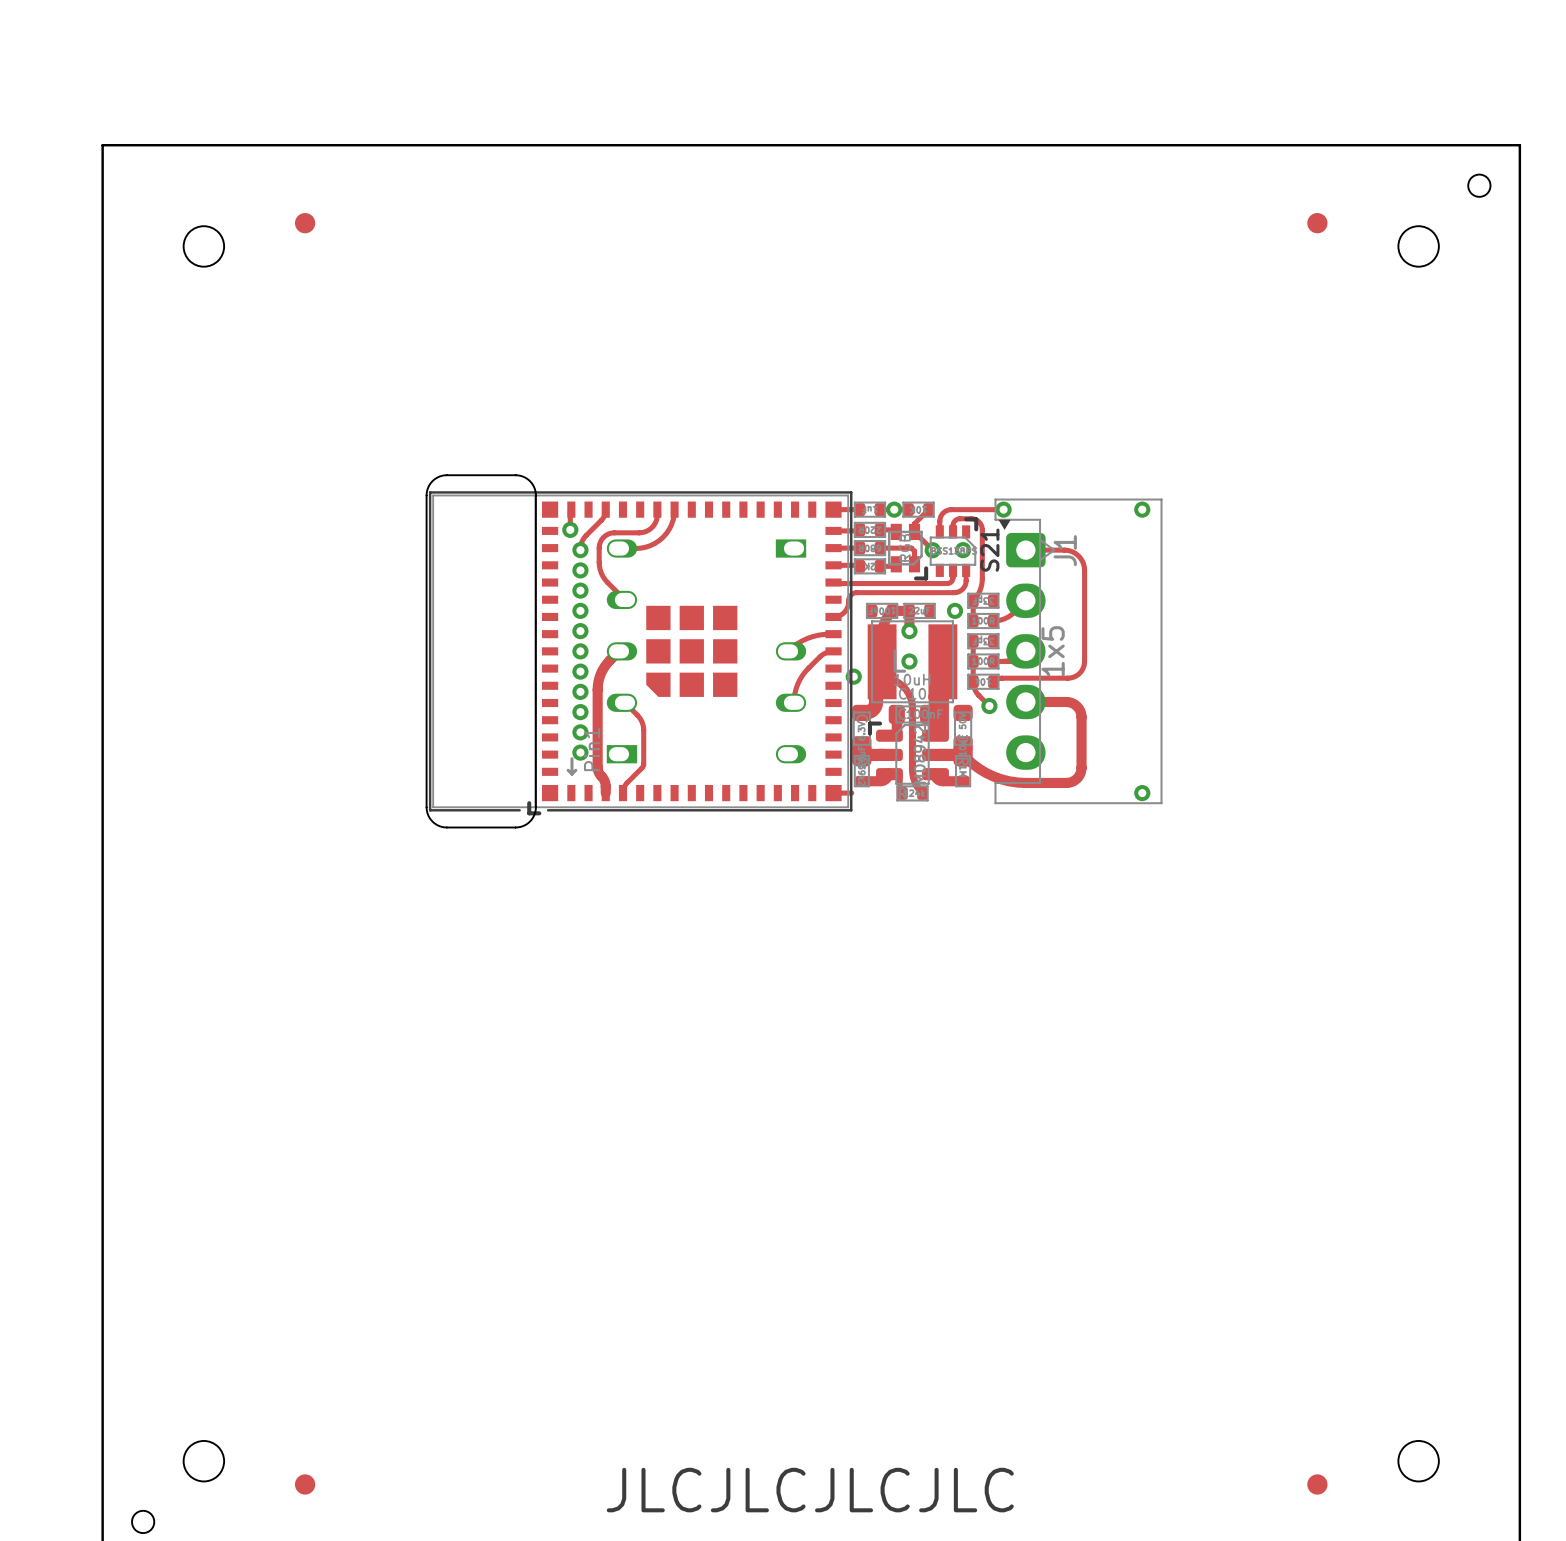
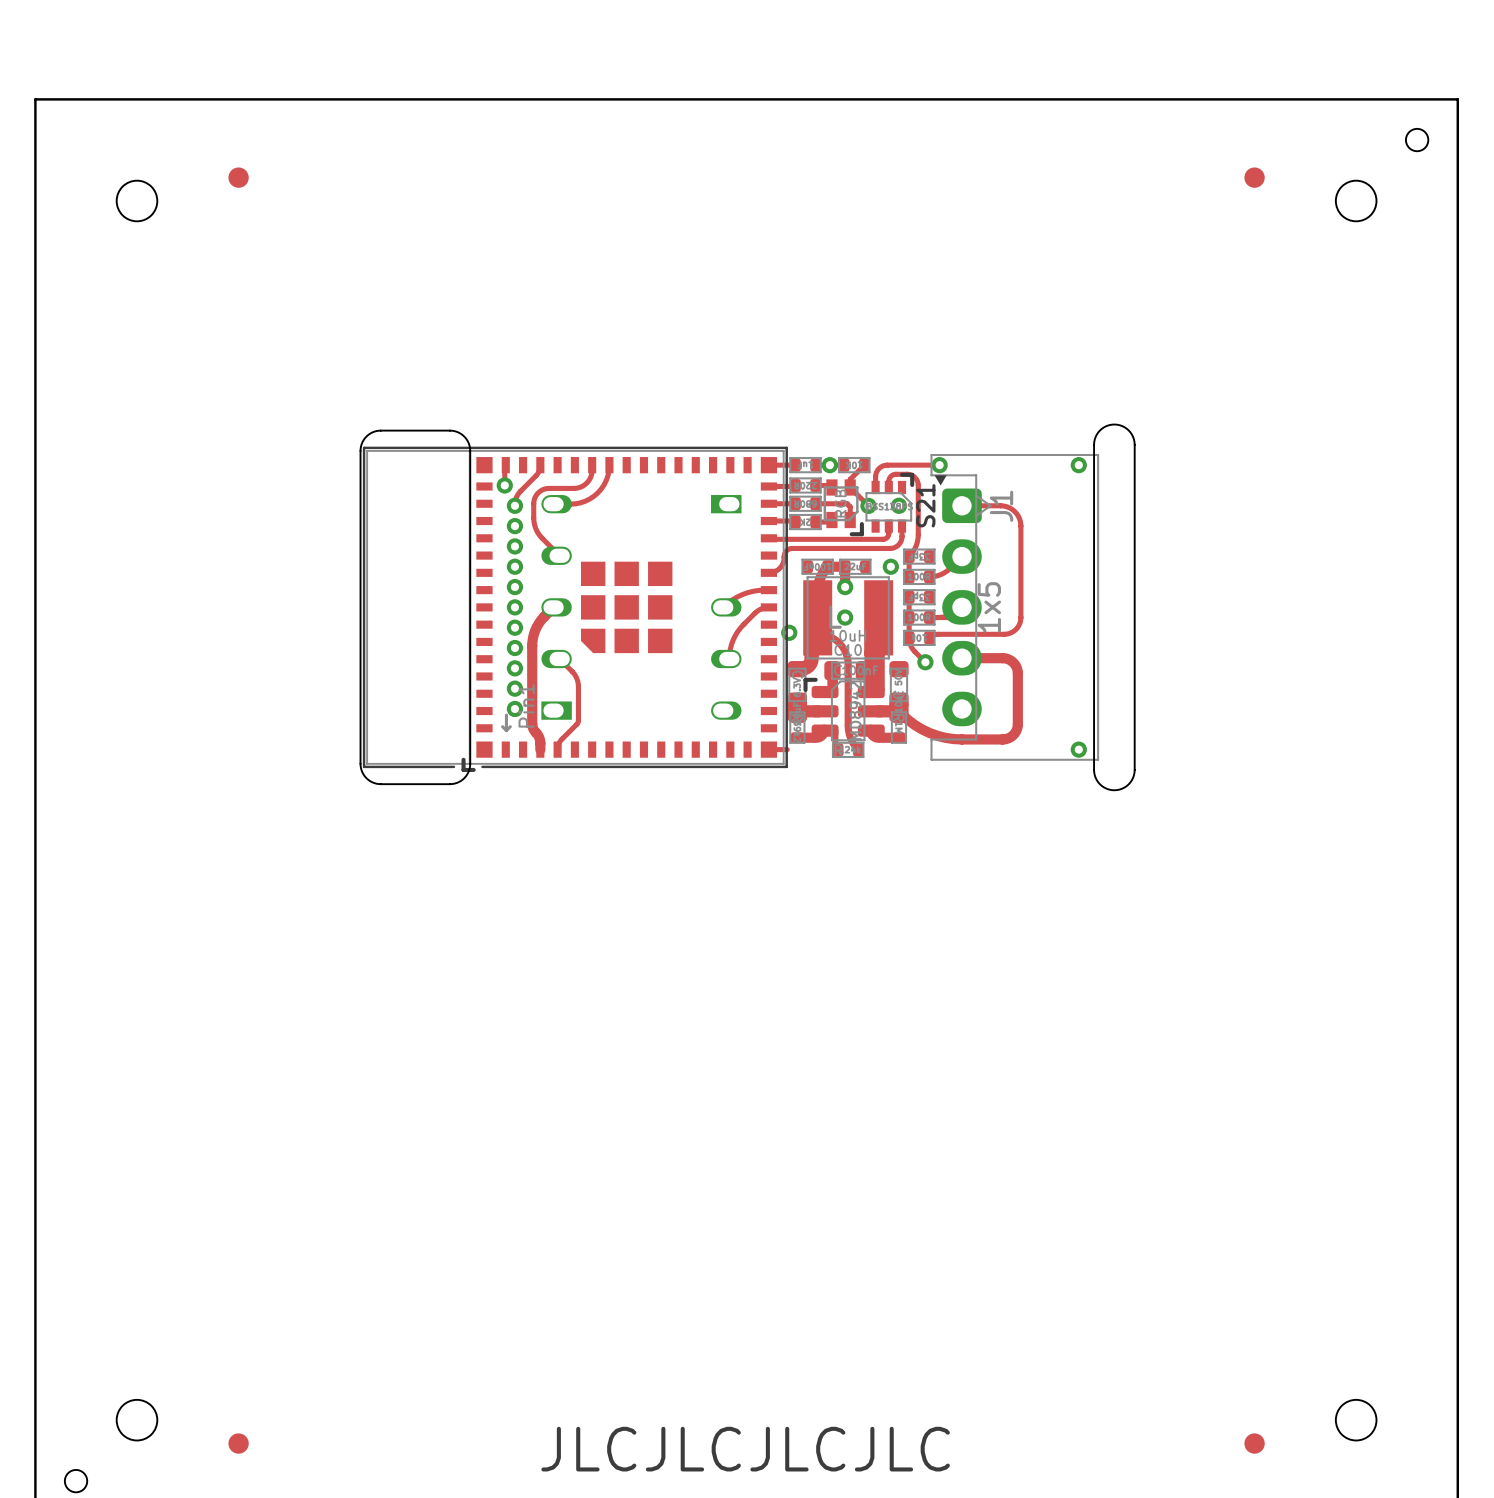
board edge: none -> (1094, 444) (1094, 769) (1095, 777) (1100, 784) (1106, 788) (1114, 790) (1122, 788) (1128, 784) (1133, 777) (1134, 769) (1134, 444) (1133, 437) (1128, 430) (1122, 426) (1114, 424) (1106, 426) (1100, 430) (1095, 437) (1094, 444)

